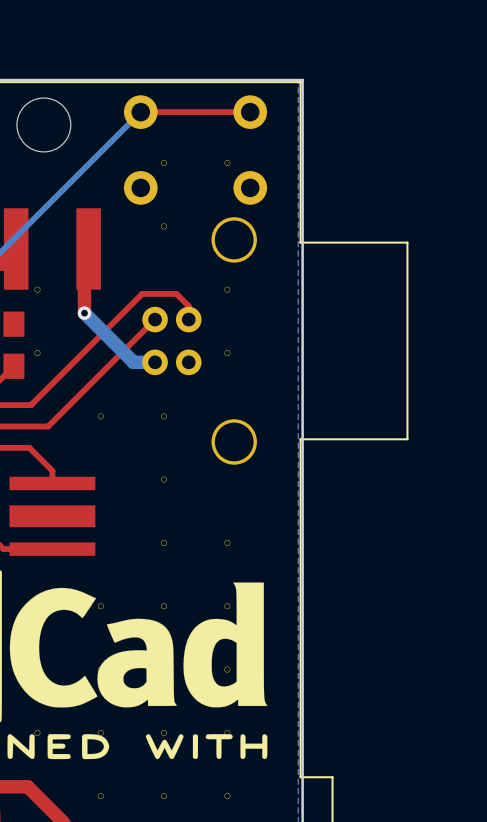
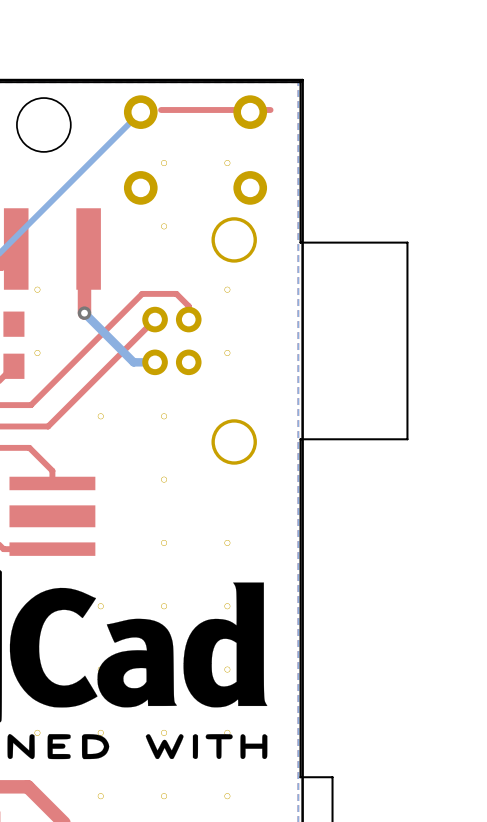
top track: (250, 112) (140, 112) -> (270, 110) (161, 110)
bottom track width: thick (84, 313) (133, 362) (155, 362) -> thin (84, 313) (133, 362) (155, 362)

